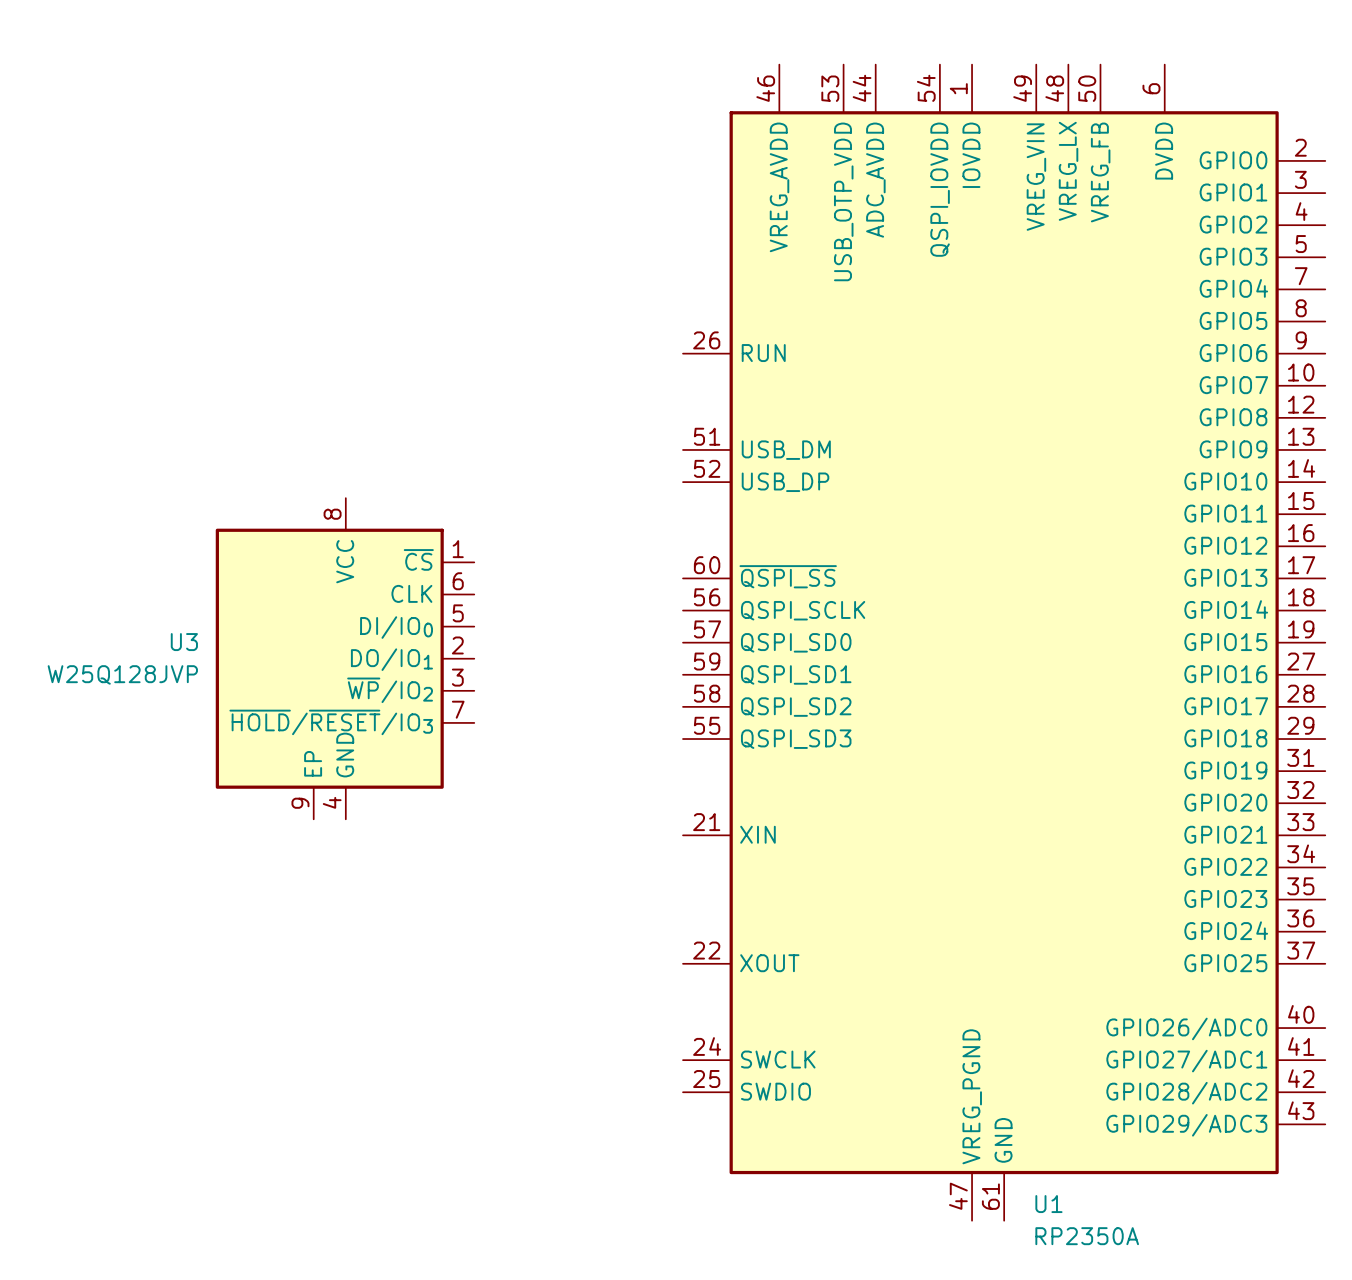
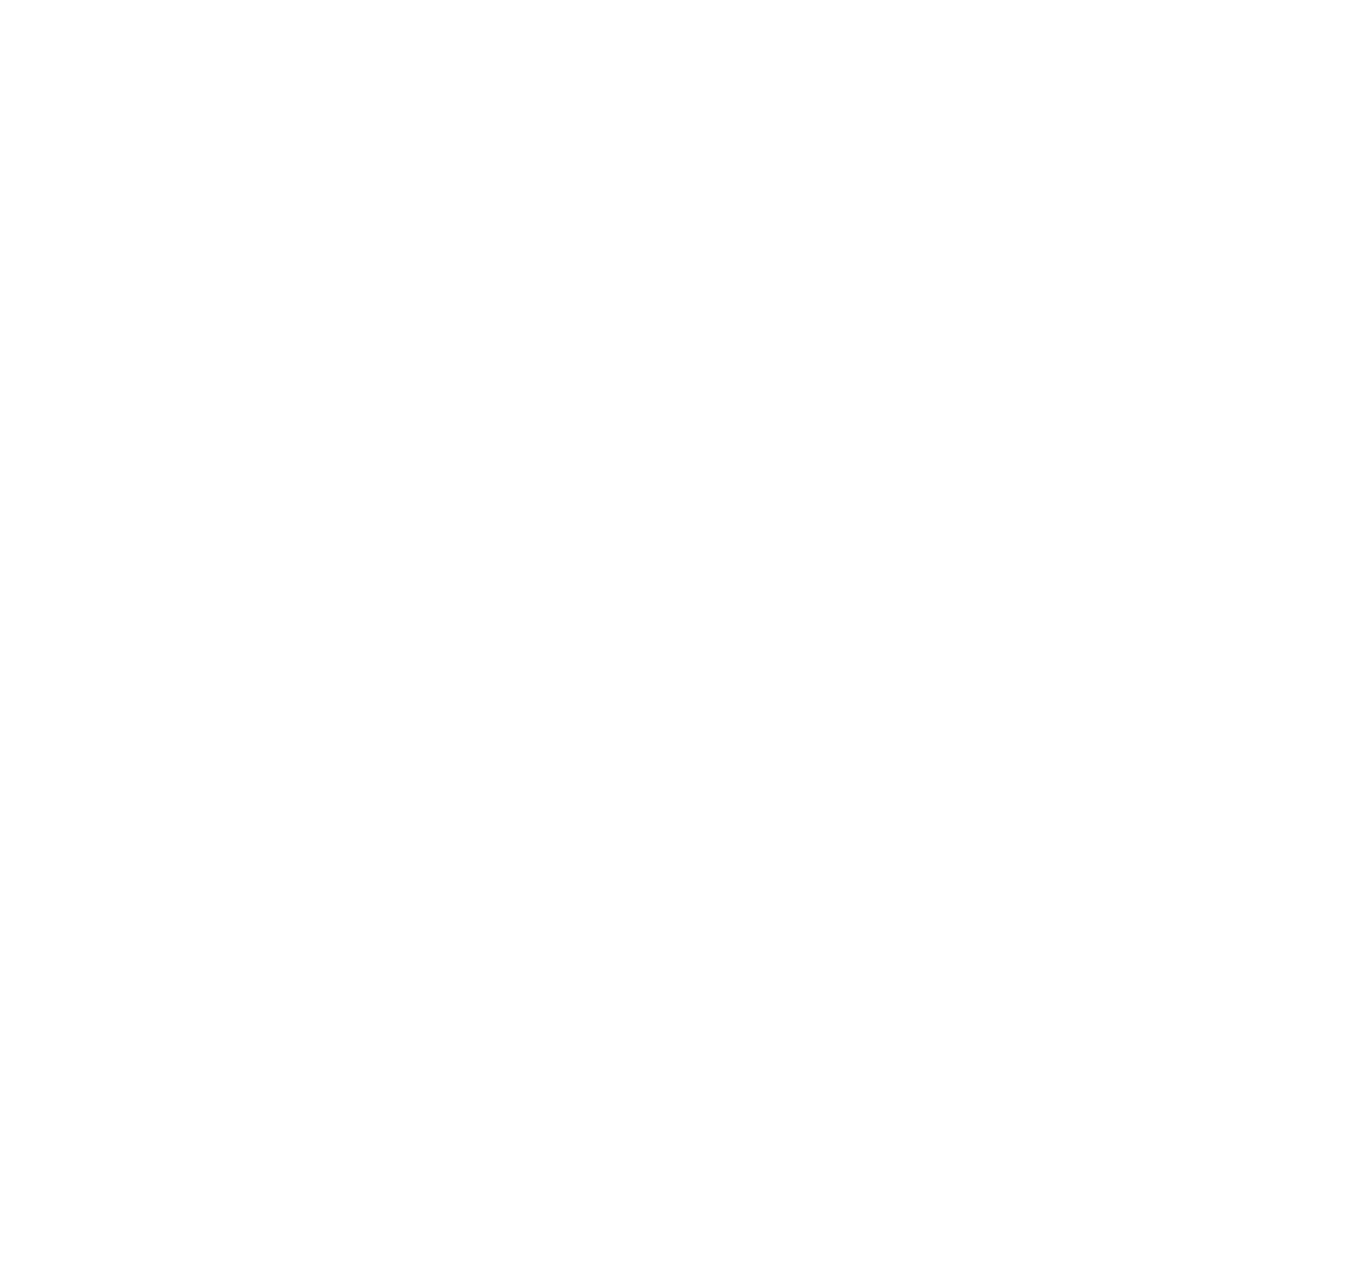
U1: RP2350A (1004, 642) -> none
U3: W25Q128JVP (345, 658) -> none

